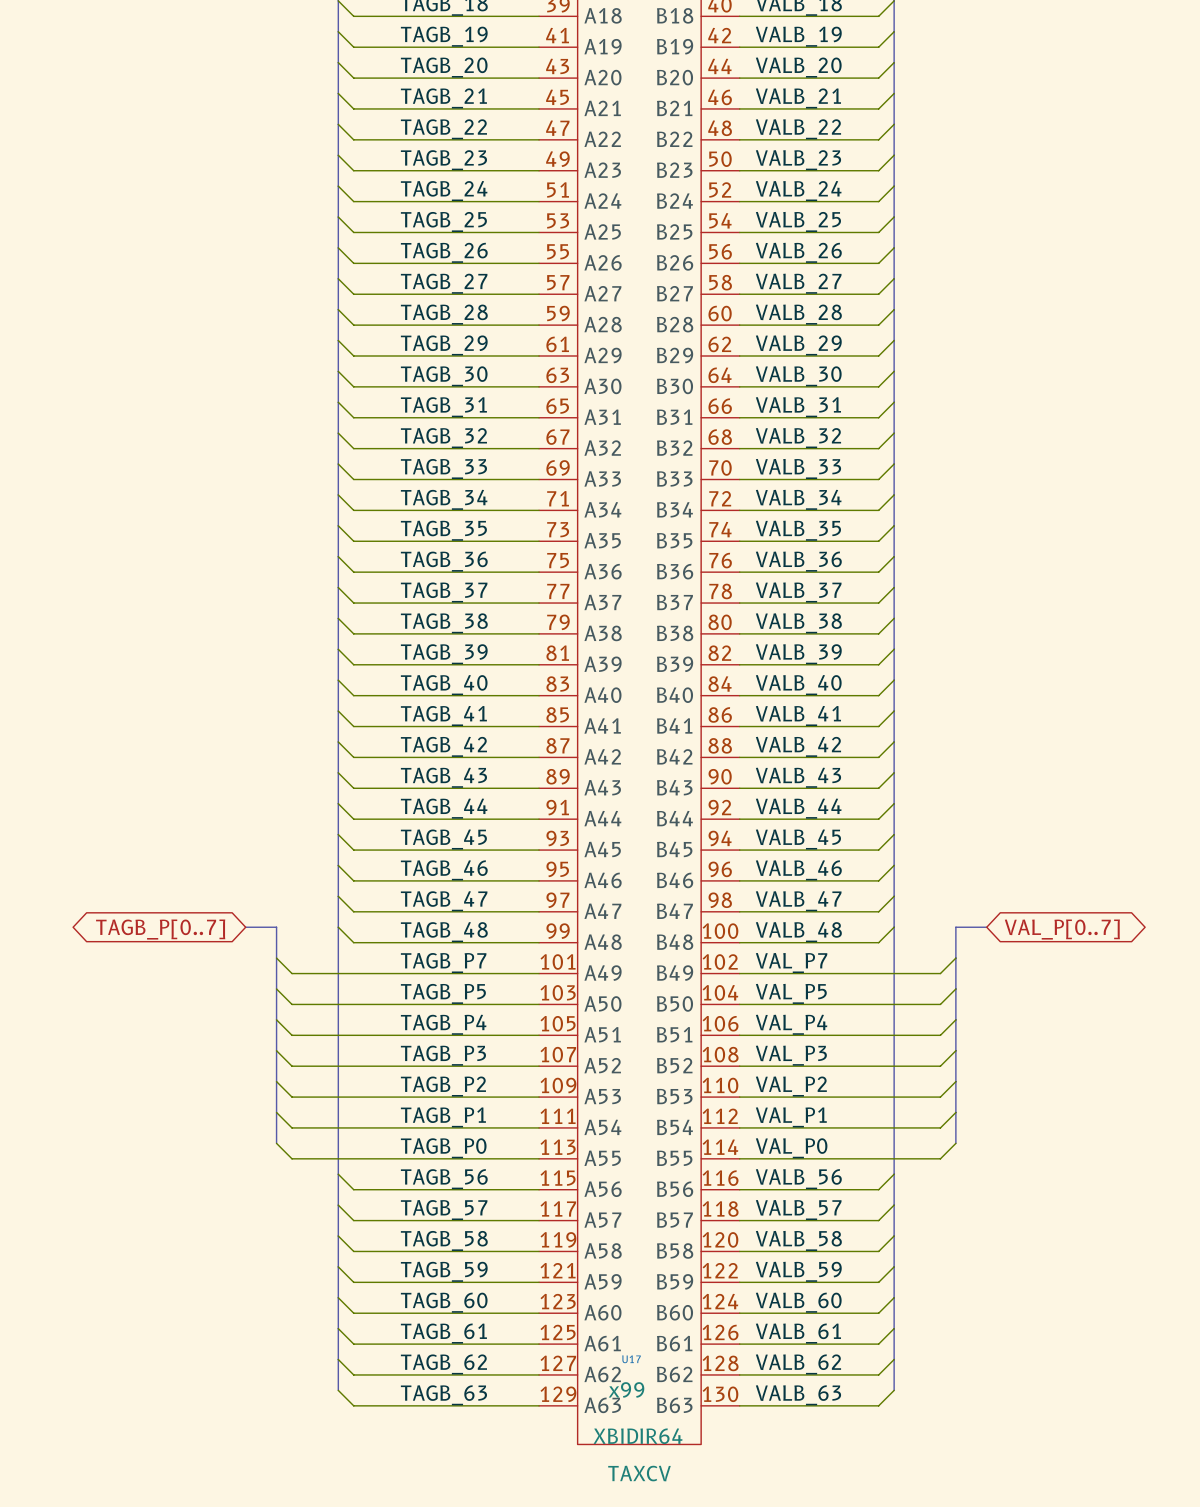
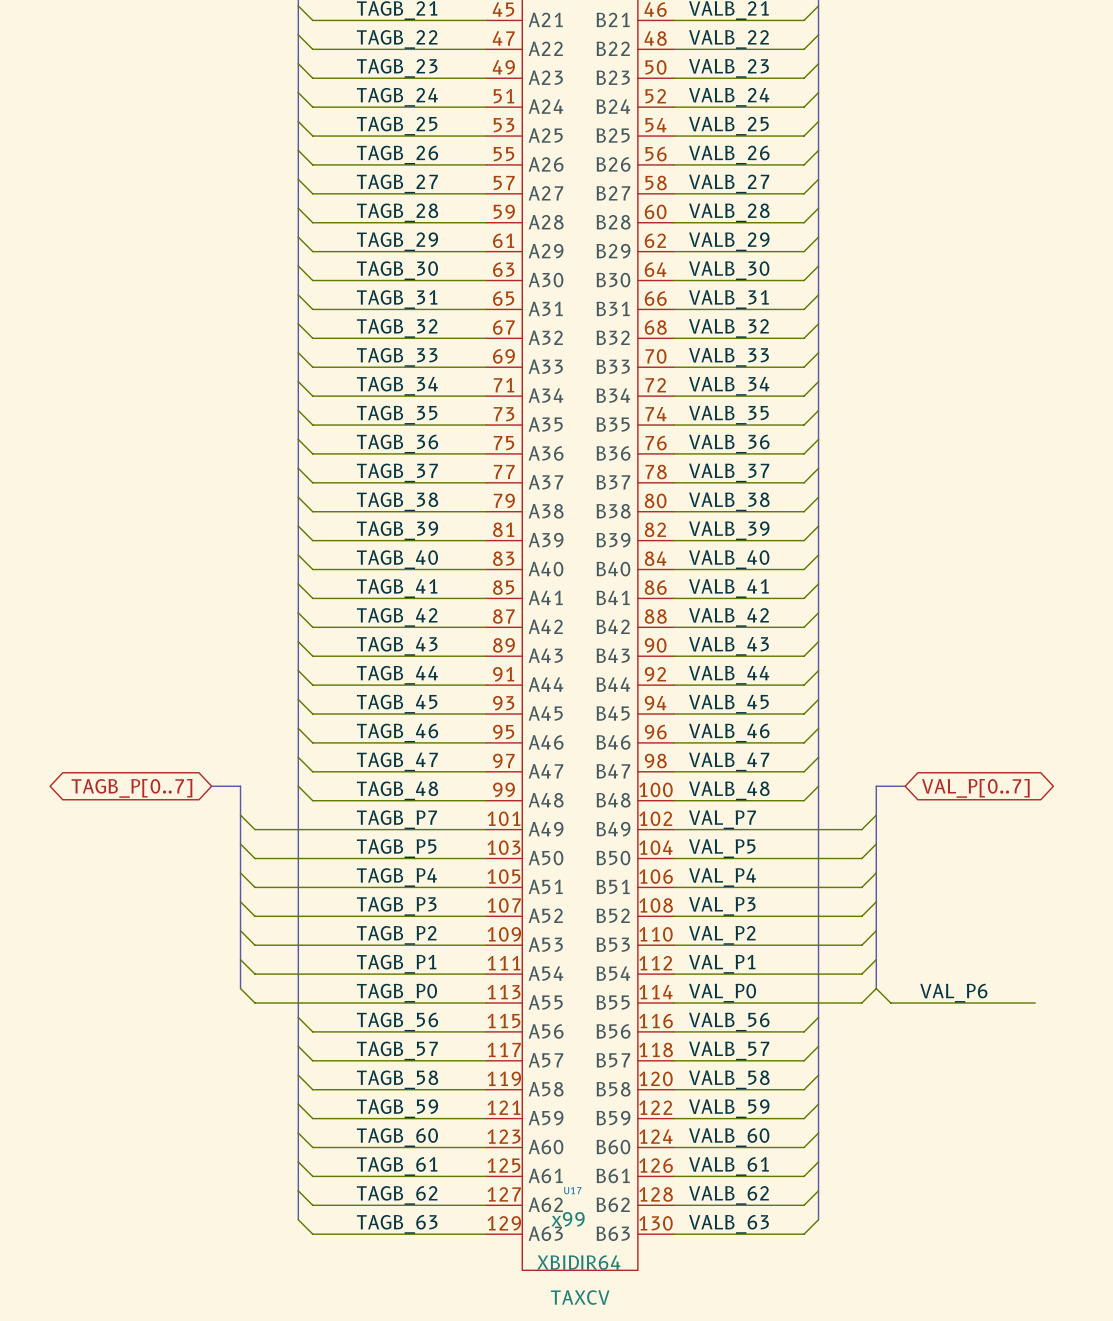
wire: none -> (876, 988) (890, 1003) (1035, 1003)
label: none -> VAL_P6 (953, 993)

